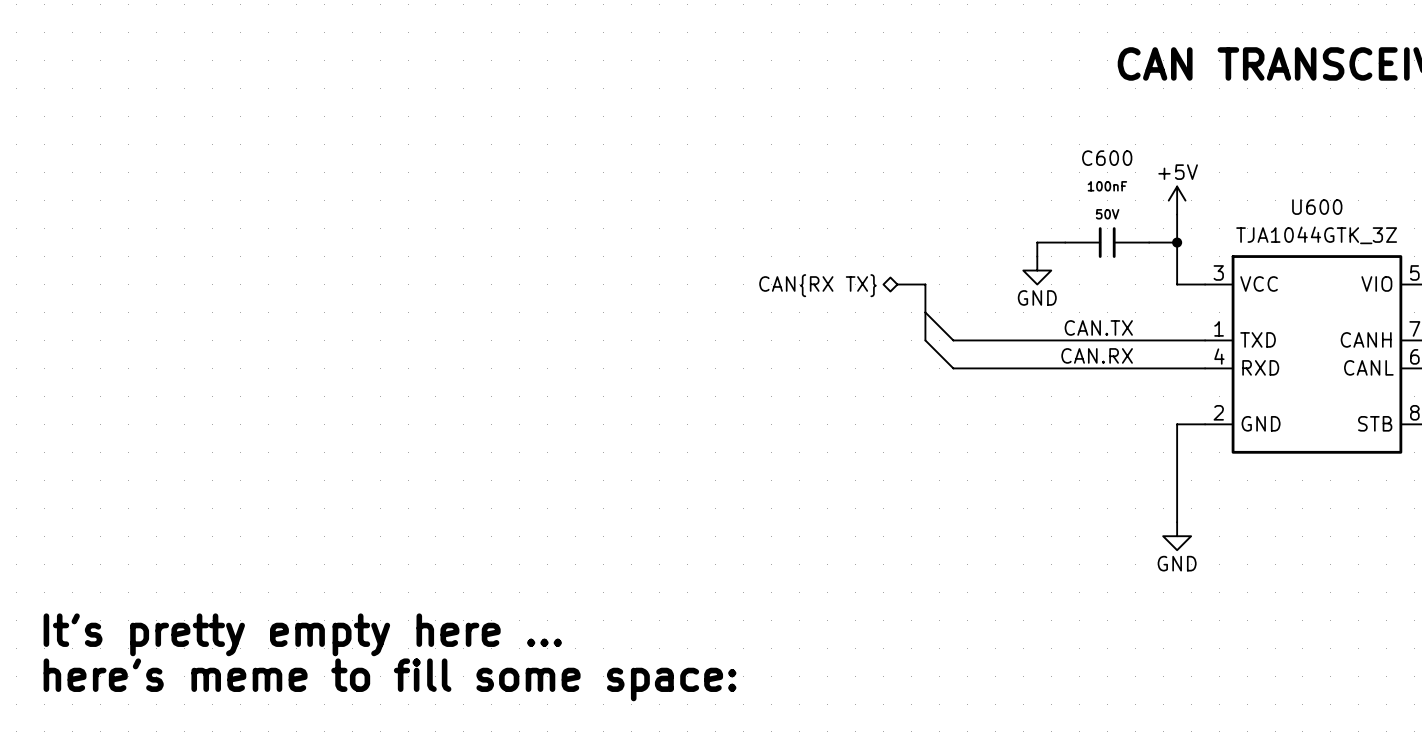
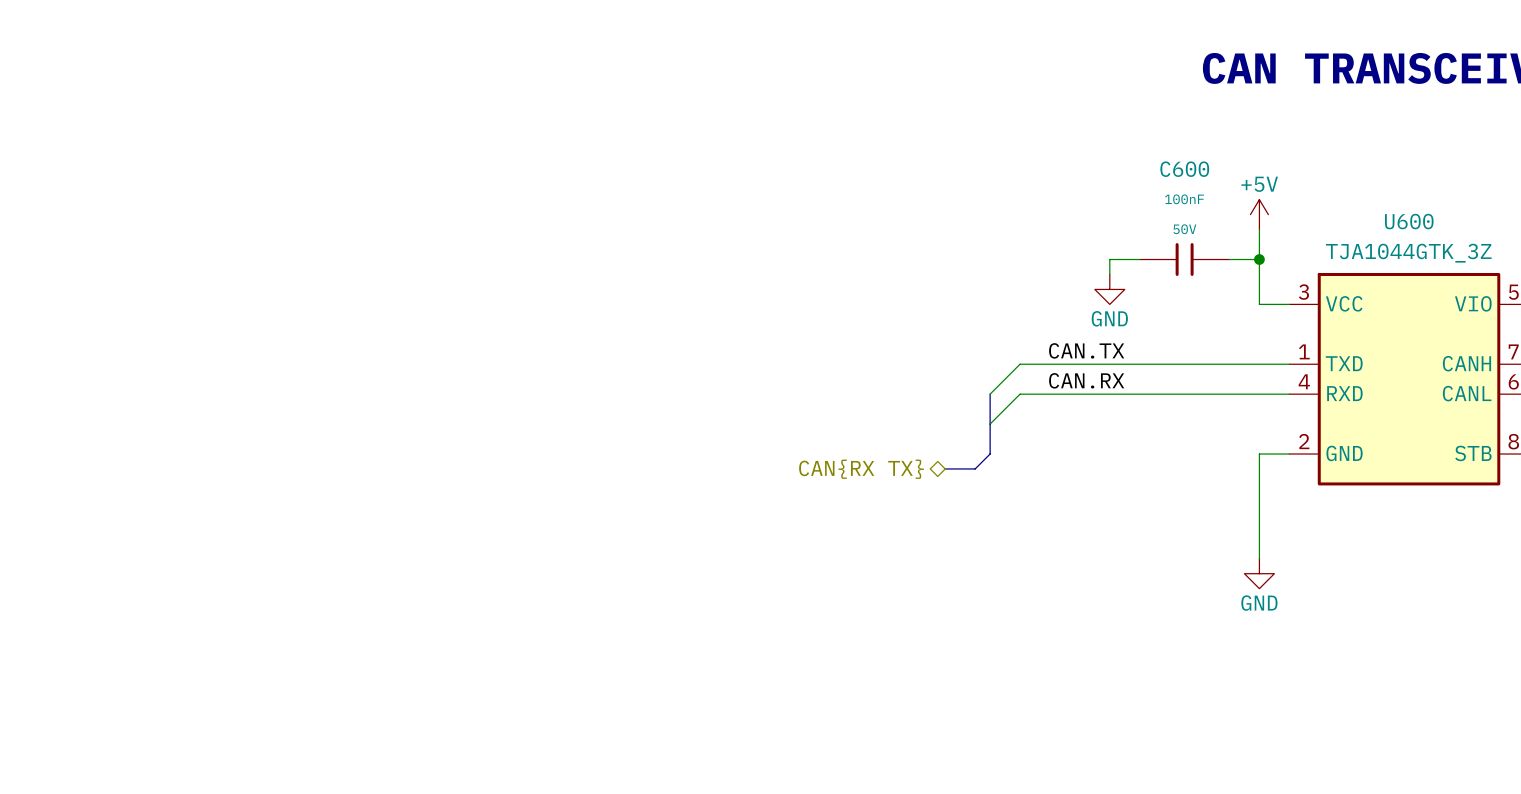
bus: (897, 284) (925, 284) (925, 340) -> none
hierarchical label position: CAN{RX TX} (817, 285) -> CAN{RX TX} (861, 469)
wire: (925, 312) (953, 340) -> (990, 394) (1020, 364)
label position: CAN.TX (1098, 327) -> CAN.TX (1086, 350)
wire: (925, 340) (953, 368) -> (990, 424) (1020, 394)
label position: CAN.RX (1097, 355) -> CAN.RX (1086, 380)
bus: none -> (990, 394) (990, 454) (975, 468) (945, 468)
text: It's pretty empty here ... (302, 634) -> none
text: here's meme to fill some space: (390, 679) -> none

